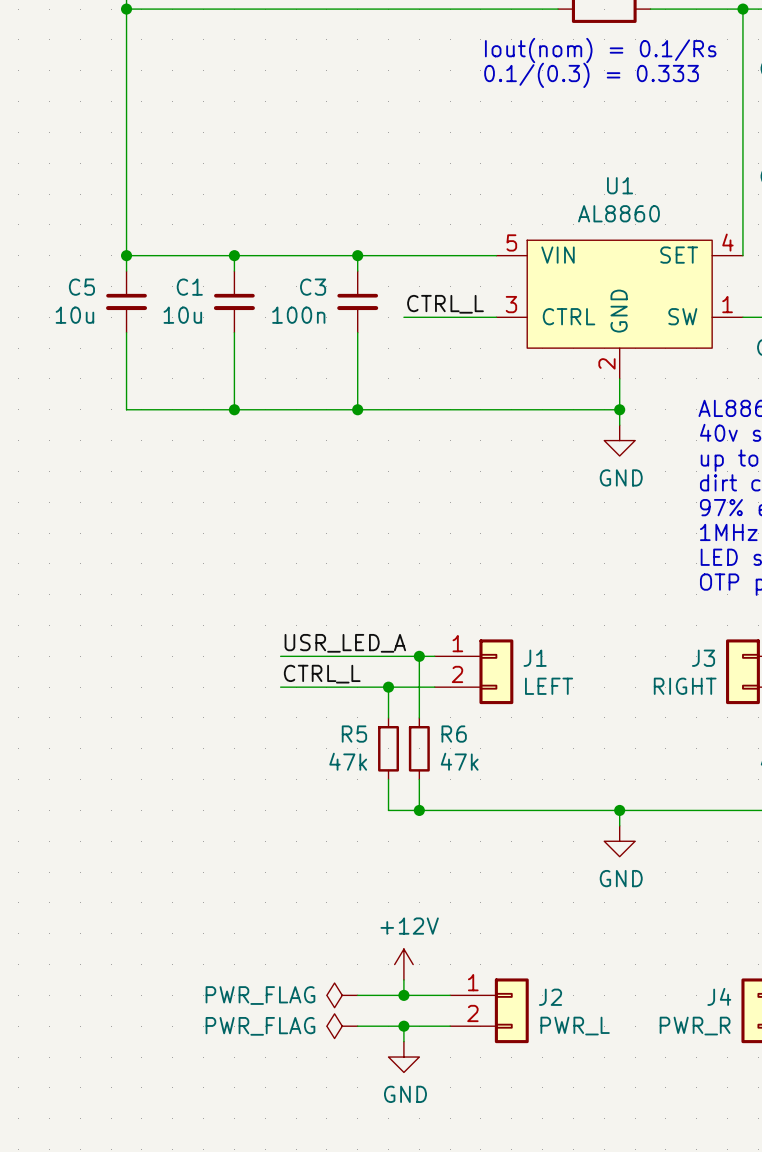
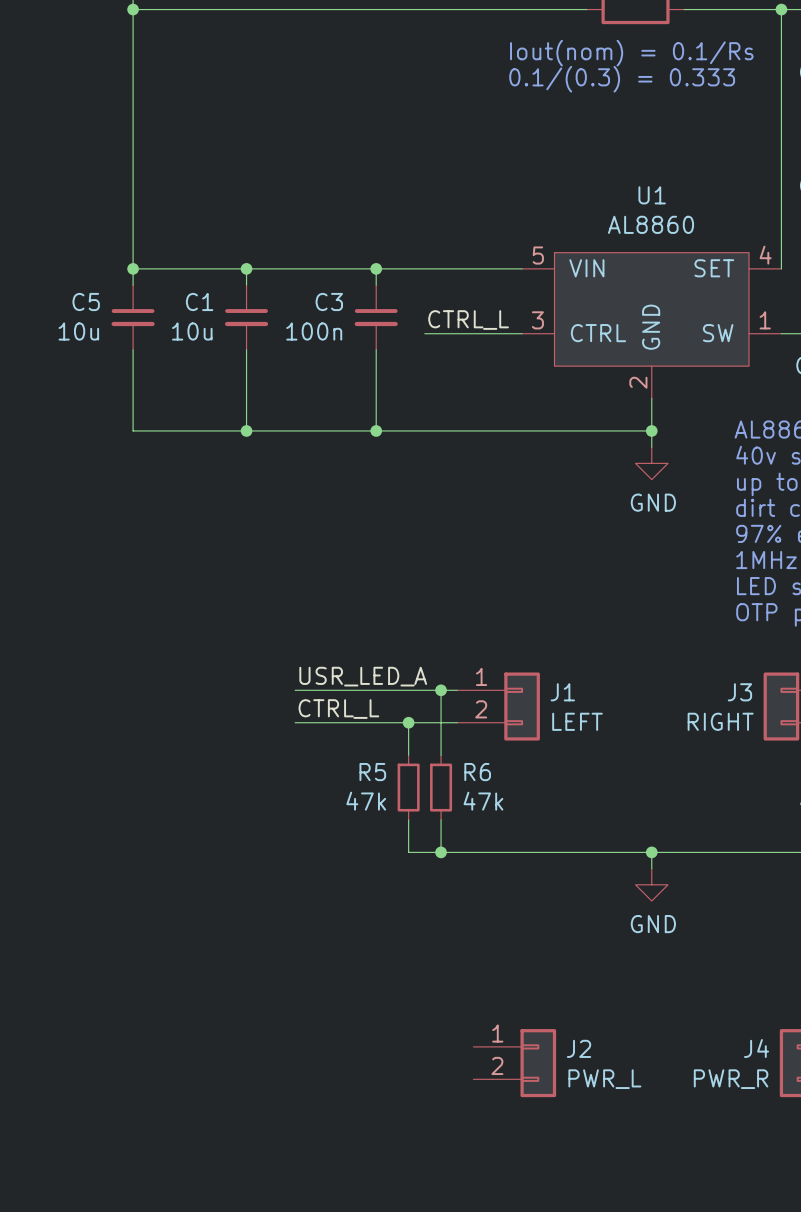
power symbol: +12V (403, 964) -> none
wire: (403, 979) (403, 995) -> none
power symbol: PWR_FLAG (342, 995) -> none
wire: (357, 995) (450, 995) -> none
junction: (403, 995) -> none
power symbol: PWR_FLAG (342, 1026) -> none
wire: (357, 1026) (450, 1026) -> none
wire: (403, 1026) (403, 1041) -> none
junction: (403, 1026) -> none
power symbol: GND (403, 1057) -> none

